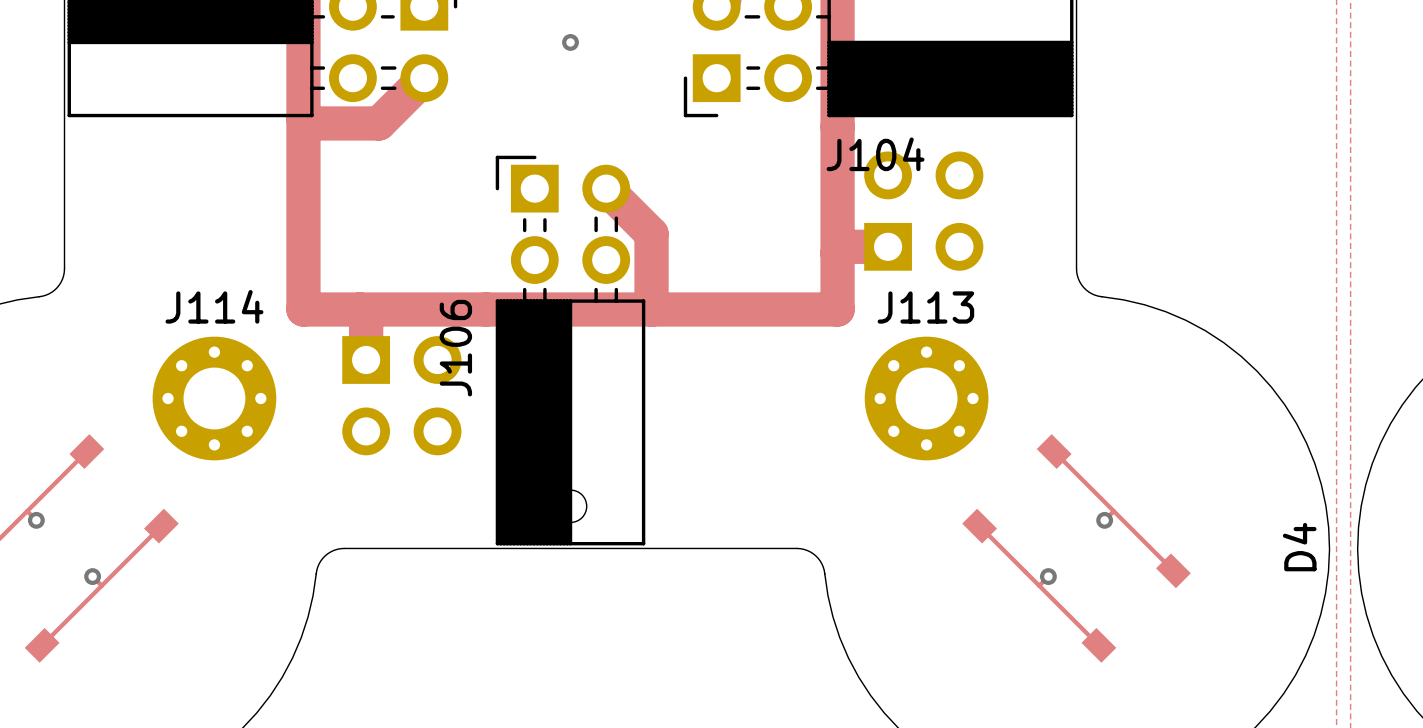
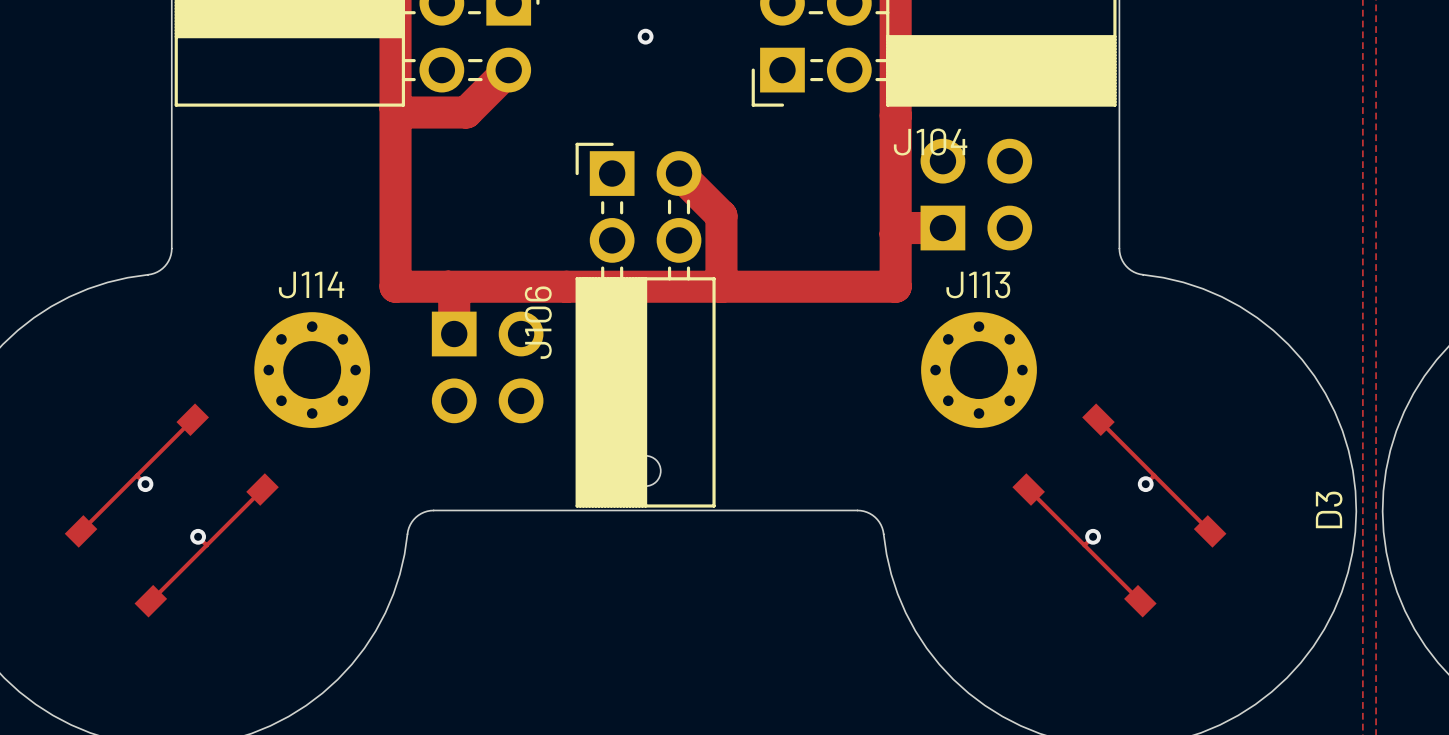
D4 name: D4 (1299, 547) -> D3 (1329, 509)

